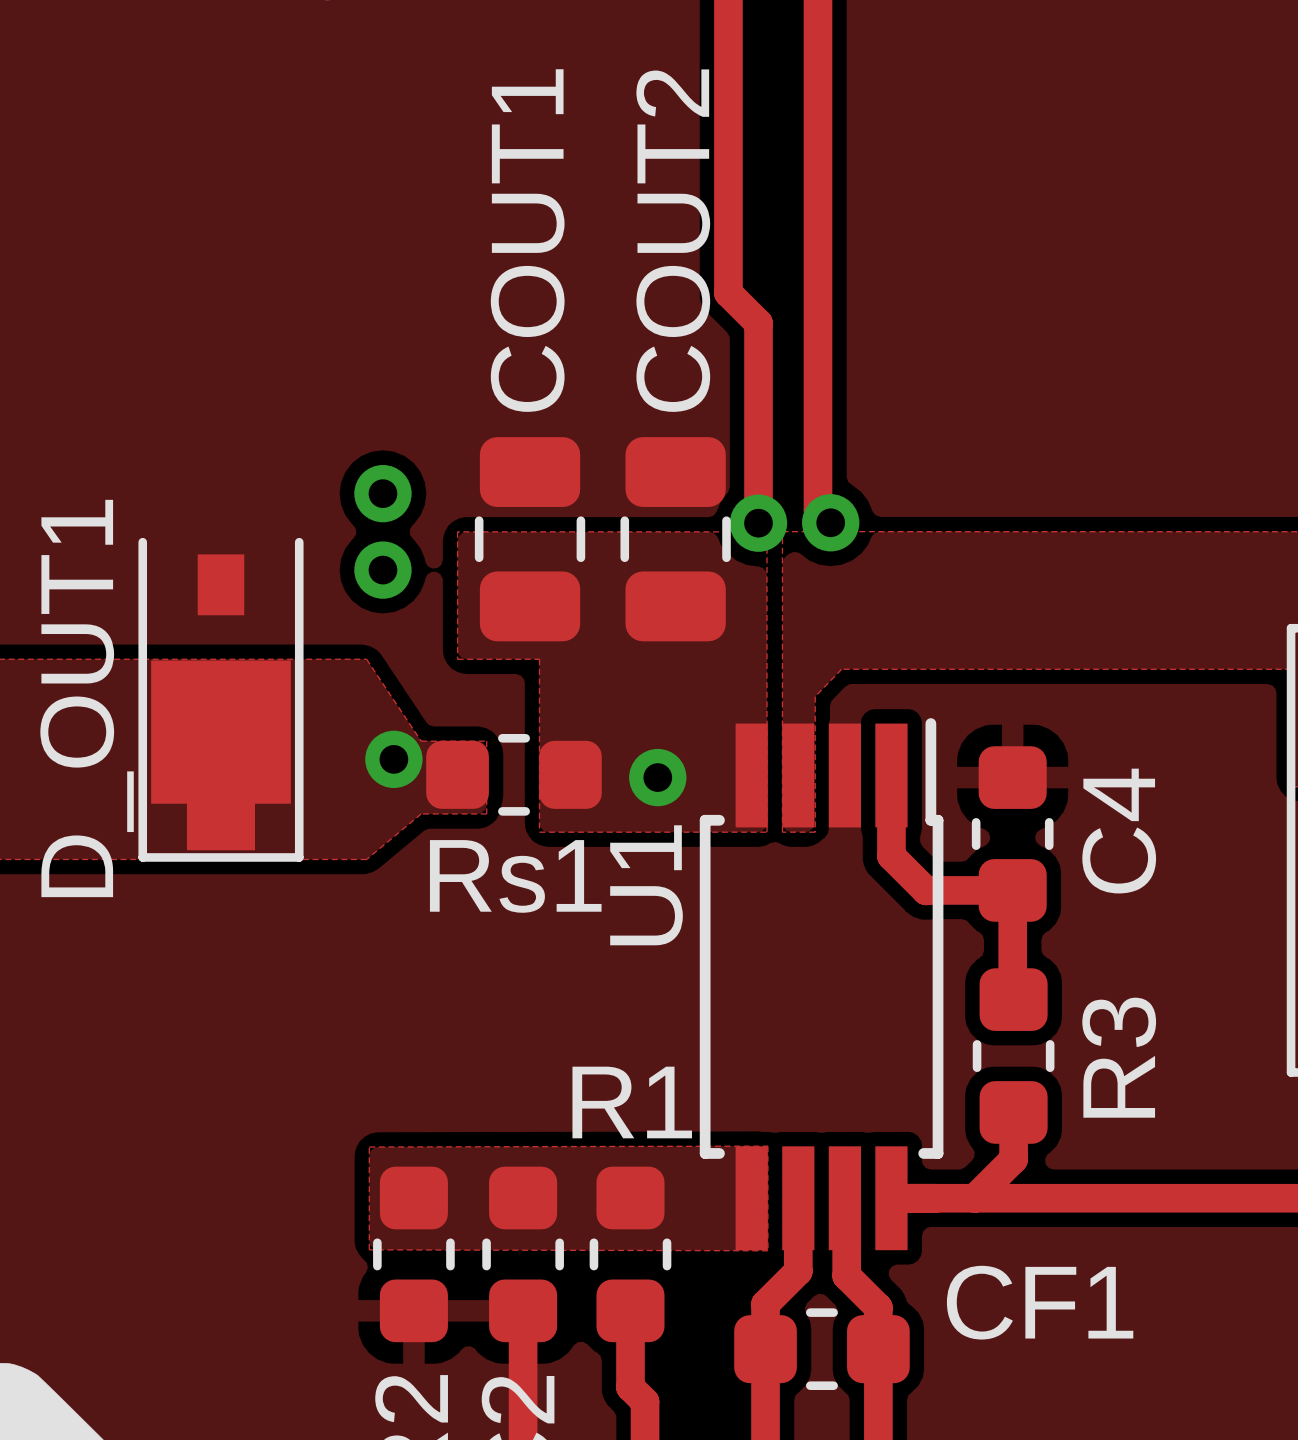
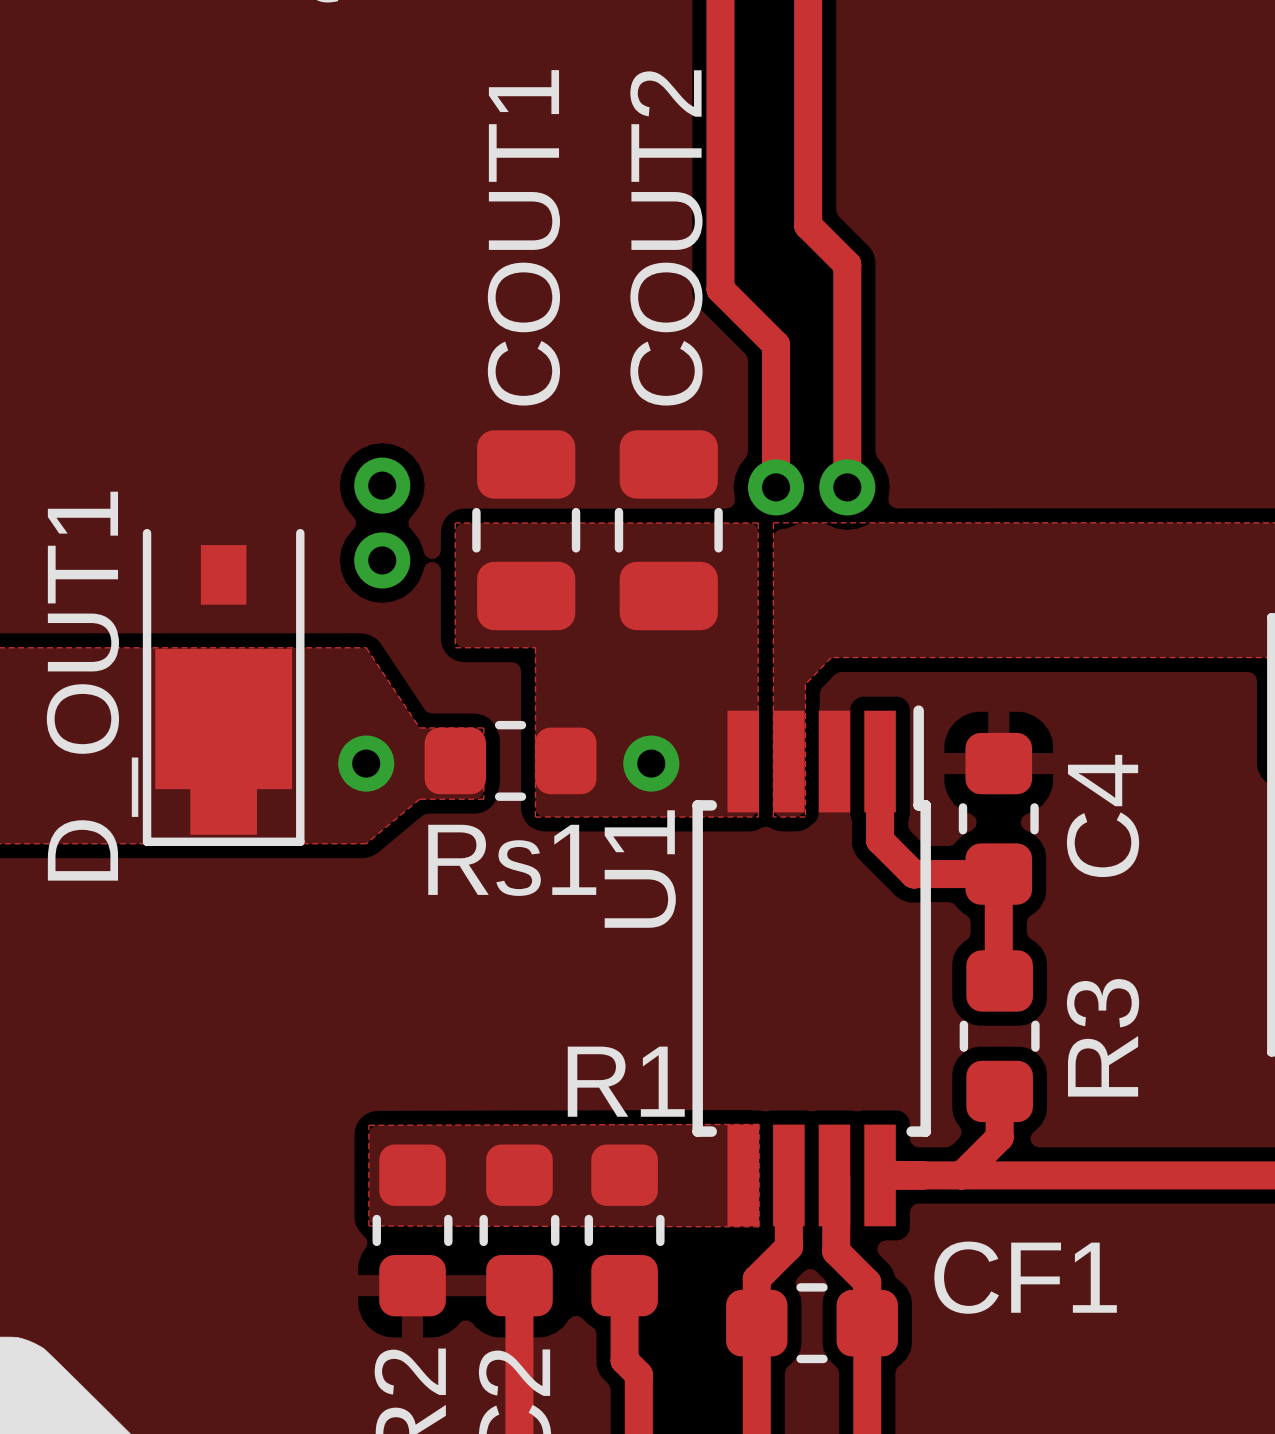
track: (818, 227) (818, 510) (830, 522) -> (808, 225) (847, 264) (847, 487)
track: (758, 323) (758, 523) -> (749, 318) (776, 344) (776, 487)
via: none -> (776, 487)
via: none -> (847, 487)
via: (830, 522) -> none
via: (758, 523) -> none
via position: (393, 759) -> (366, 763)

